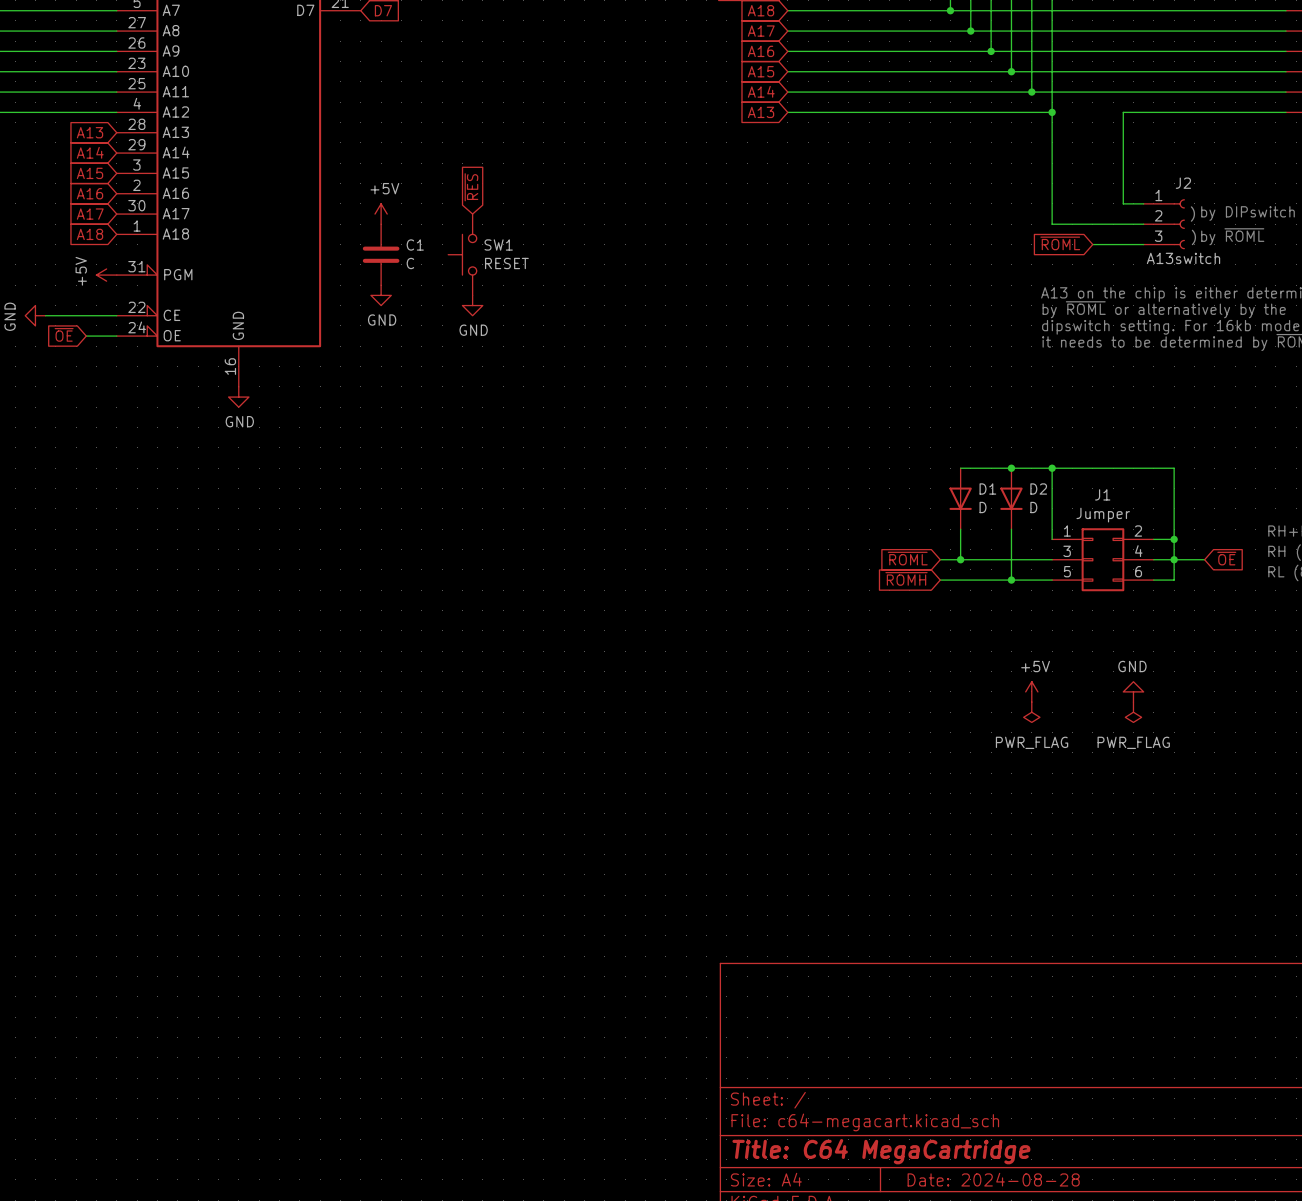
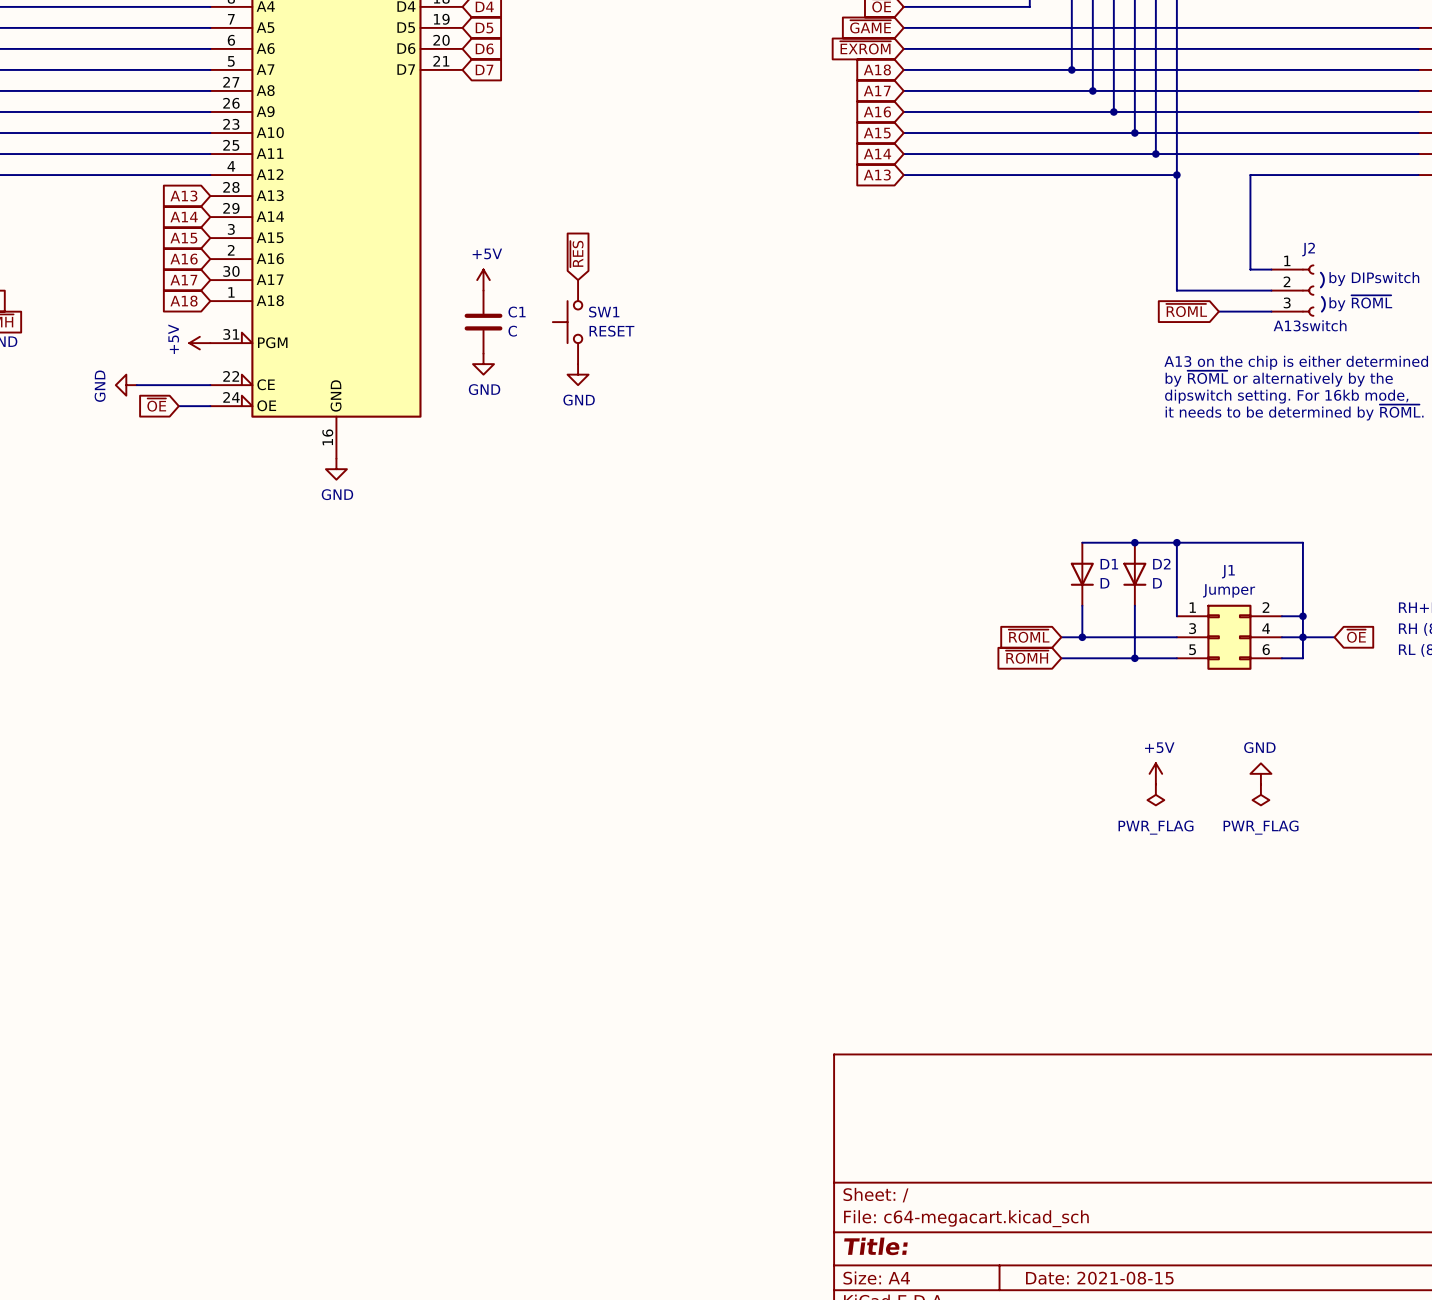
title block: Title: C64 MegaCartridge (881, 1151) -> Title: (875, 1246)
title block: Date: 2024-08-28 (993, 1179) -> Date: 2021-08-15 (1099, 1278)

